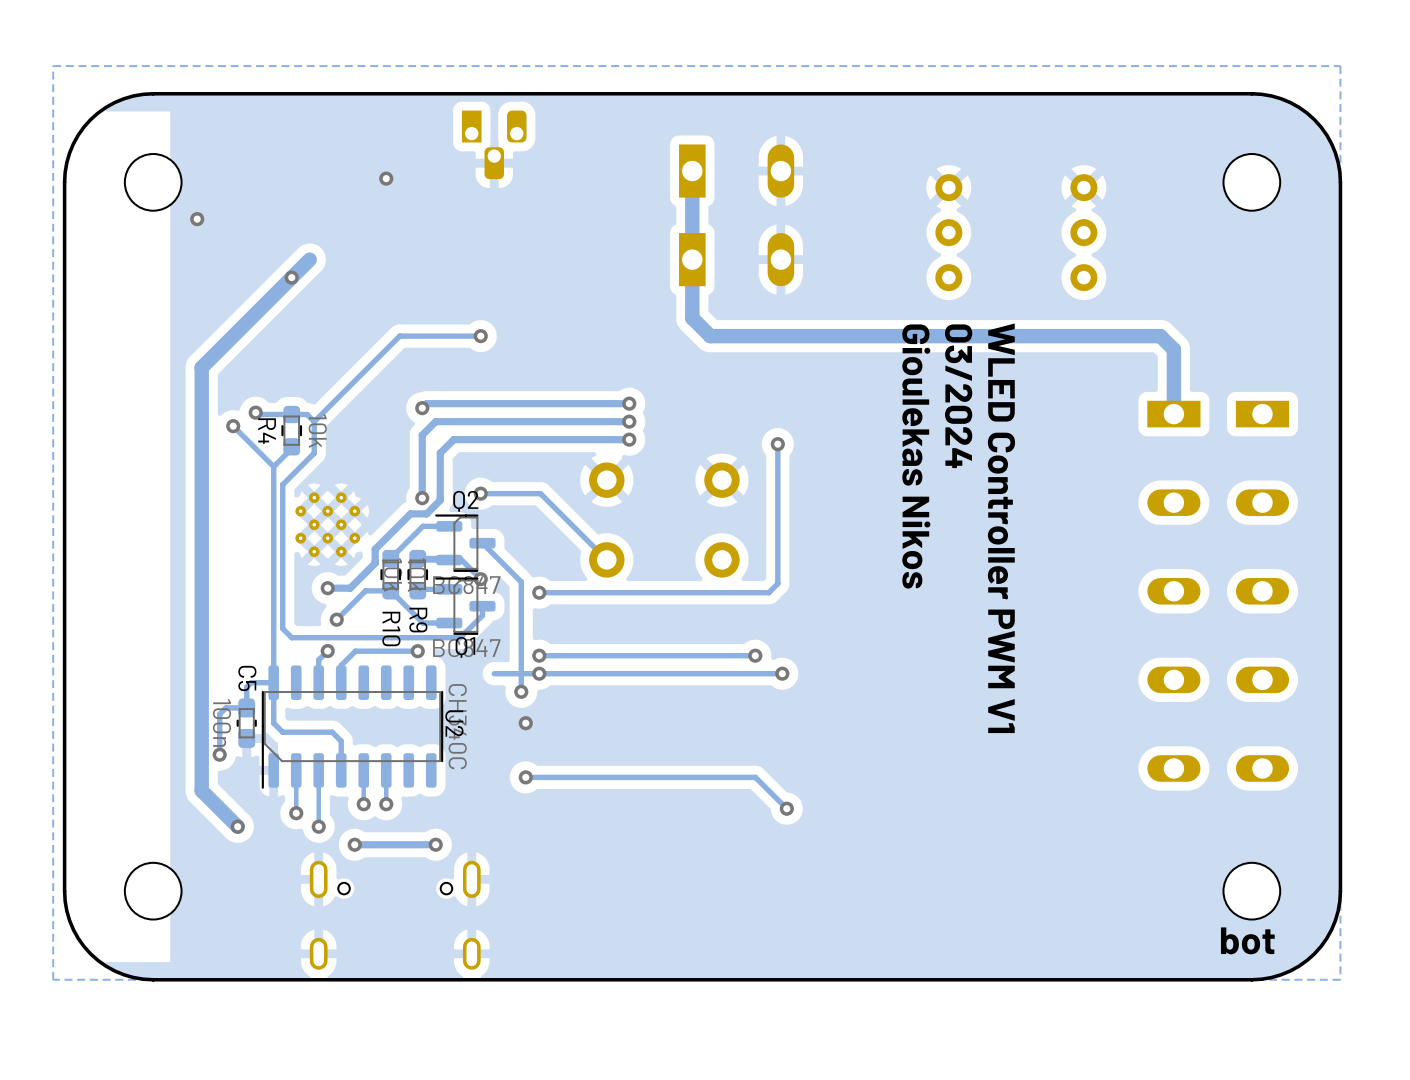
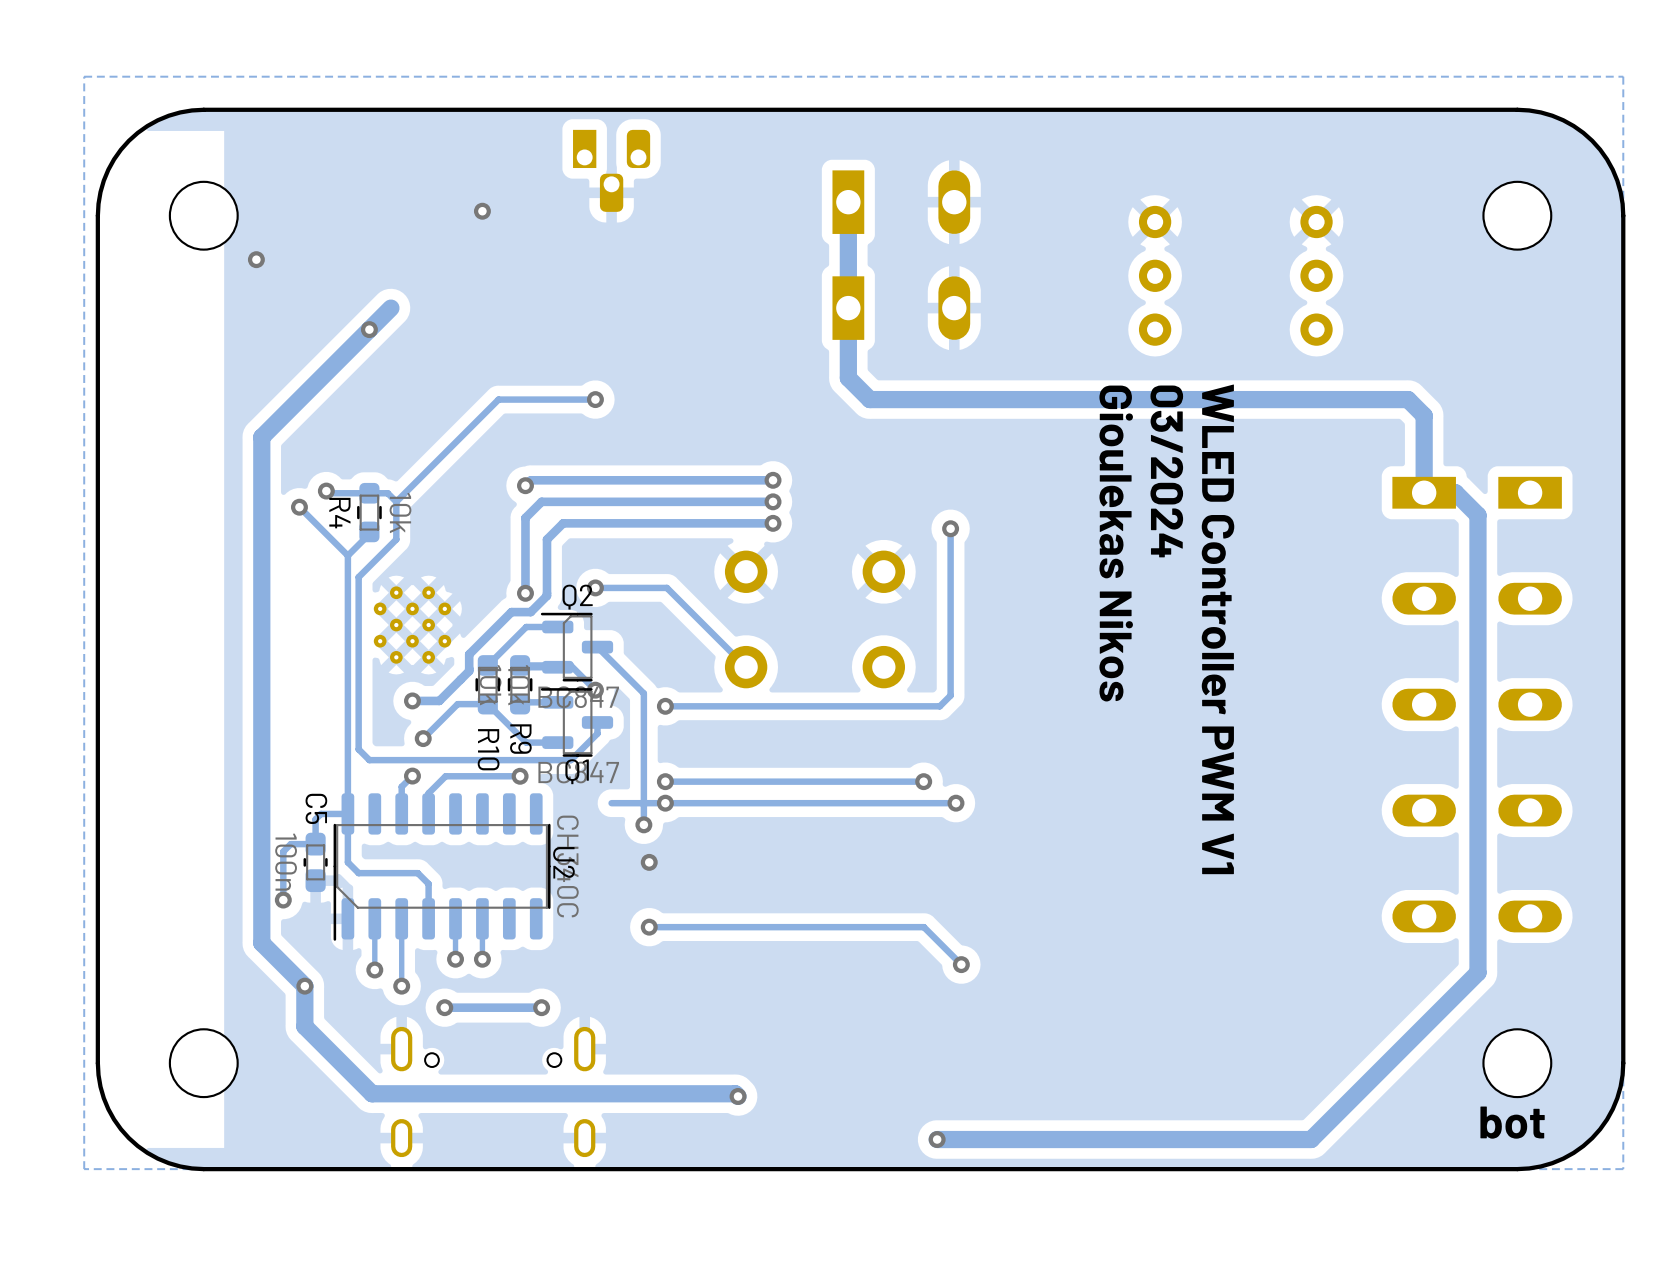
track: none -> (1424, 492) (1455, 492) (1477, 515) (1477, 972) (1311, 1139) (937, 1139)
track: none -> (304, 986) (304, 1026) (372, 1093) (735, 1093) (738, 1096)
via: none -> (738, 1096)
via: none -> (937, 1139)

